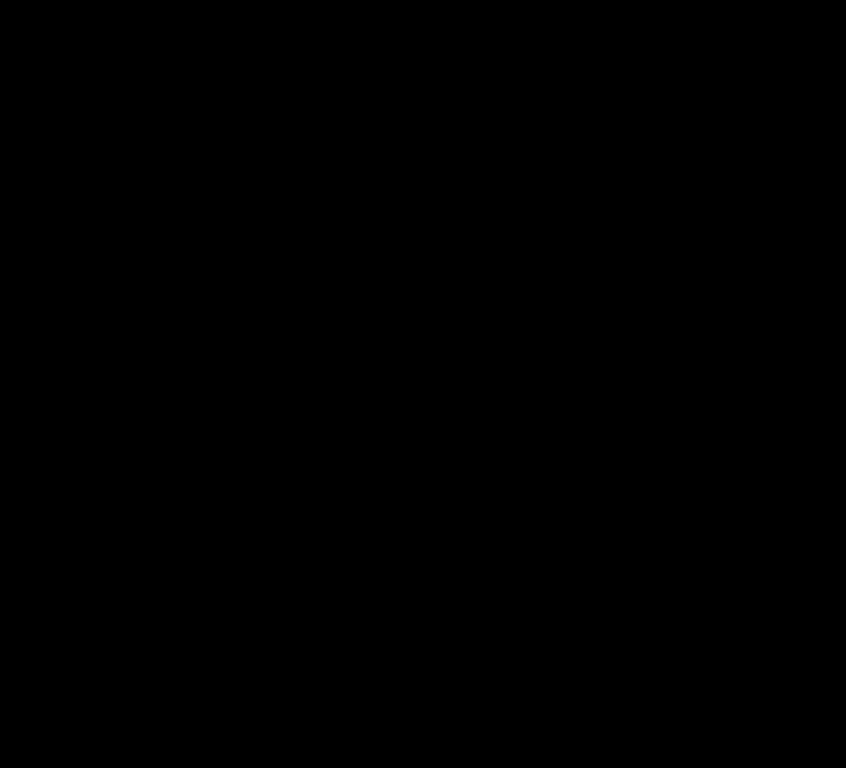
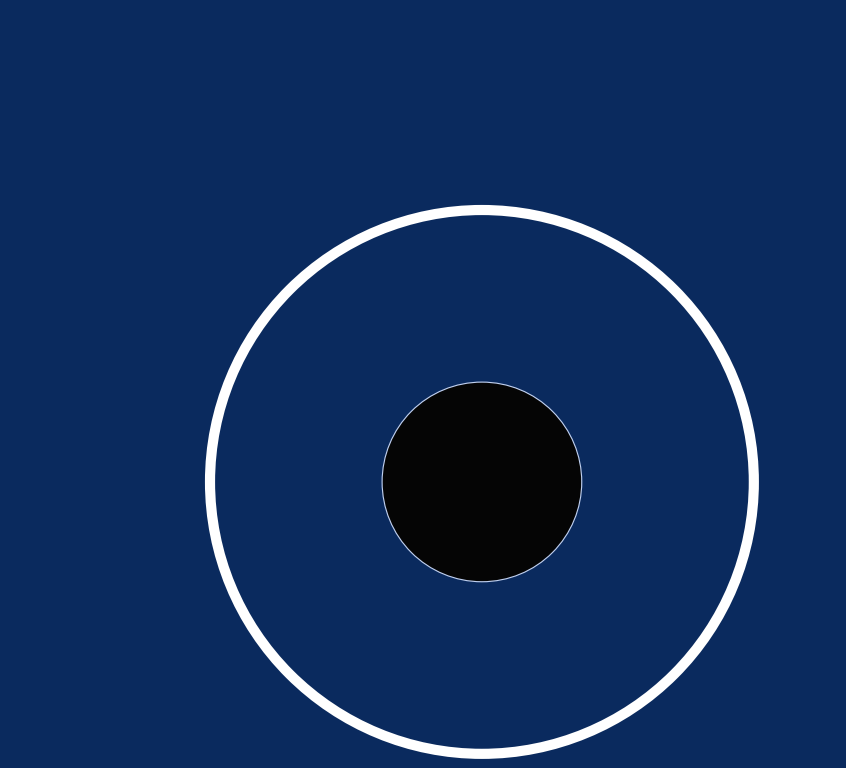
part: none -> (481, 481)

